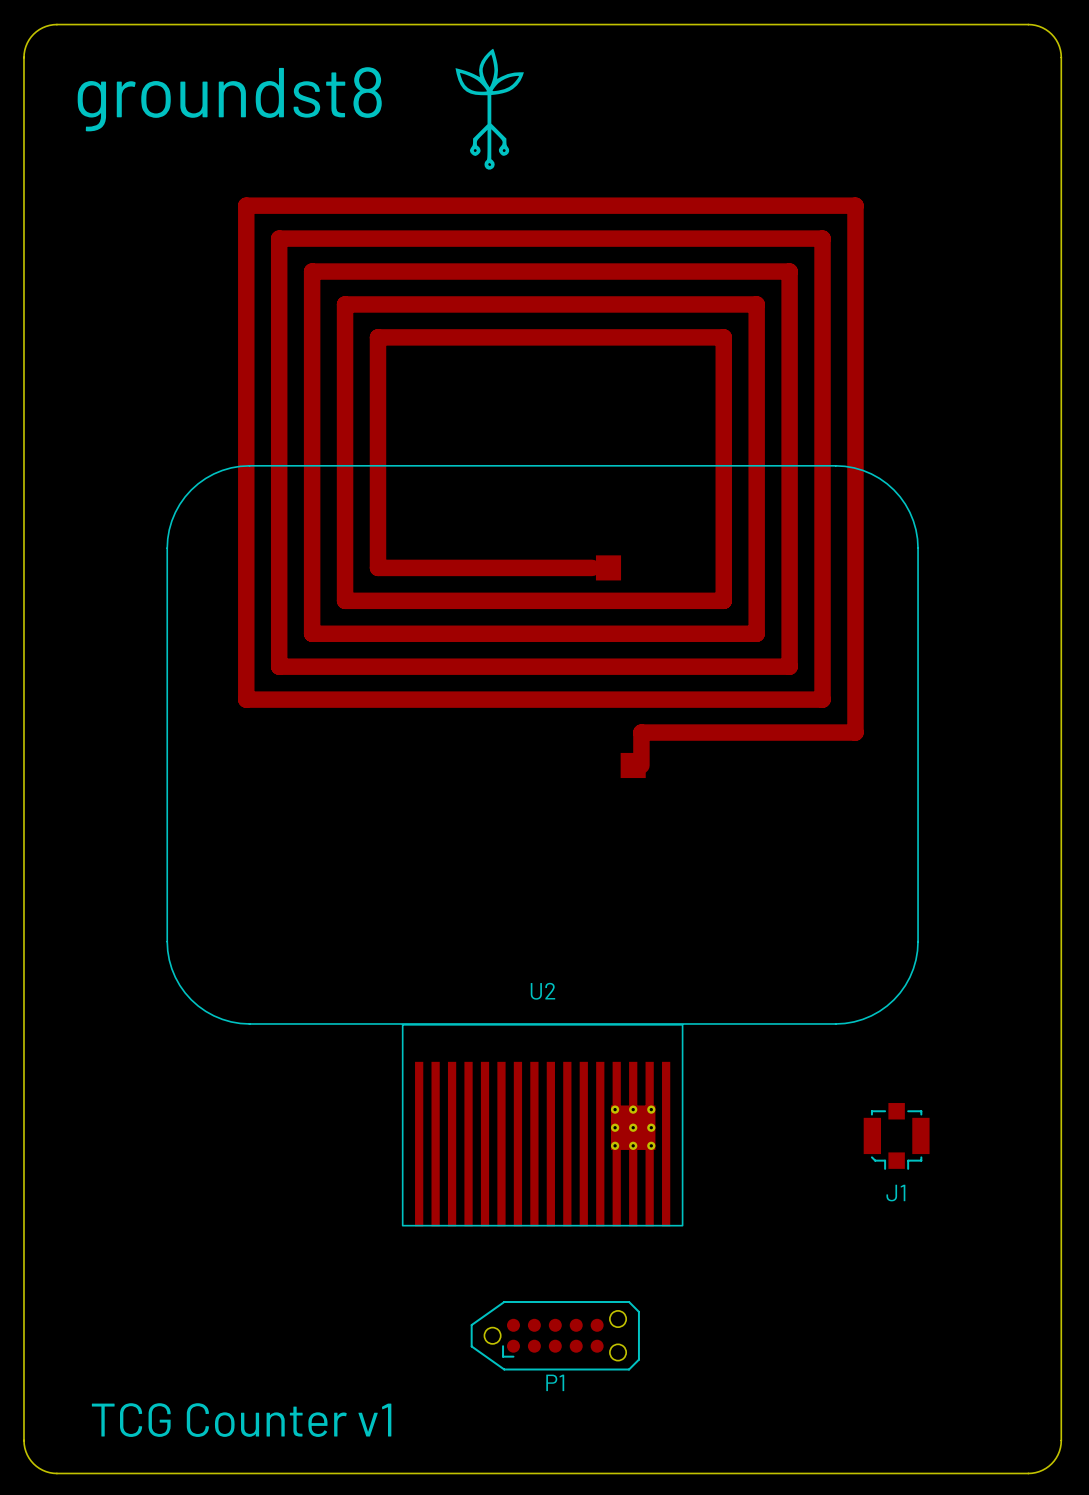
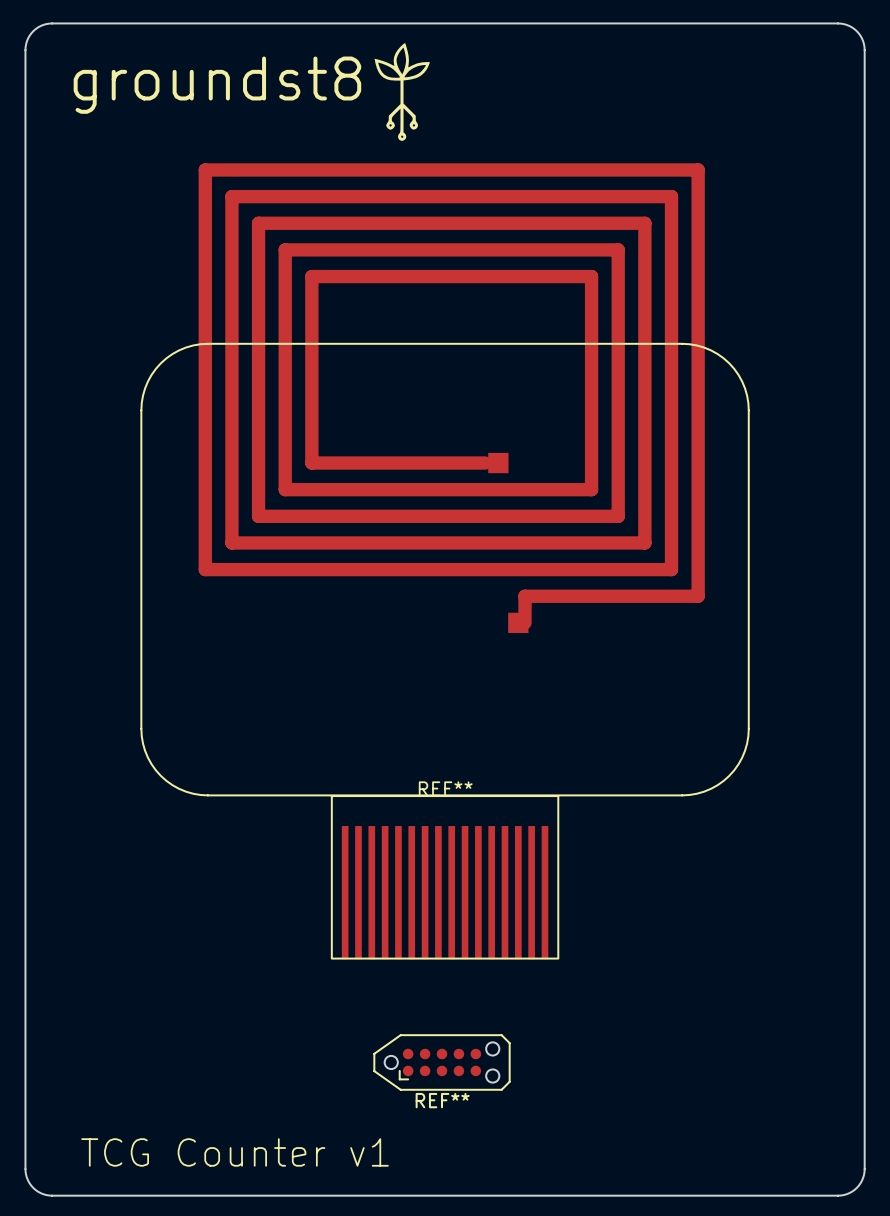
REF**: none -> (445, 651)
U2: (542, 845) -> none
part: (633, 1127) -> none
J1: (896, 1136) -> none
REF**: none -> (442, 1062)
P1: (555, 1335) -> none

